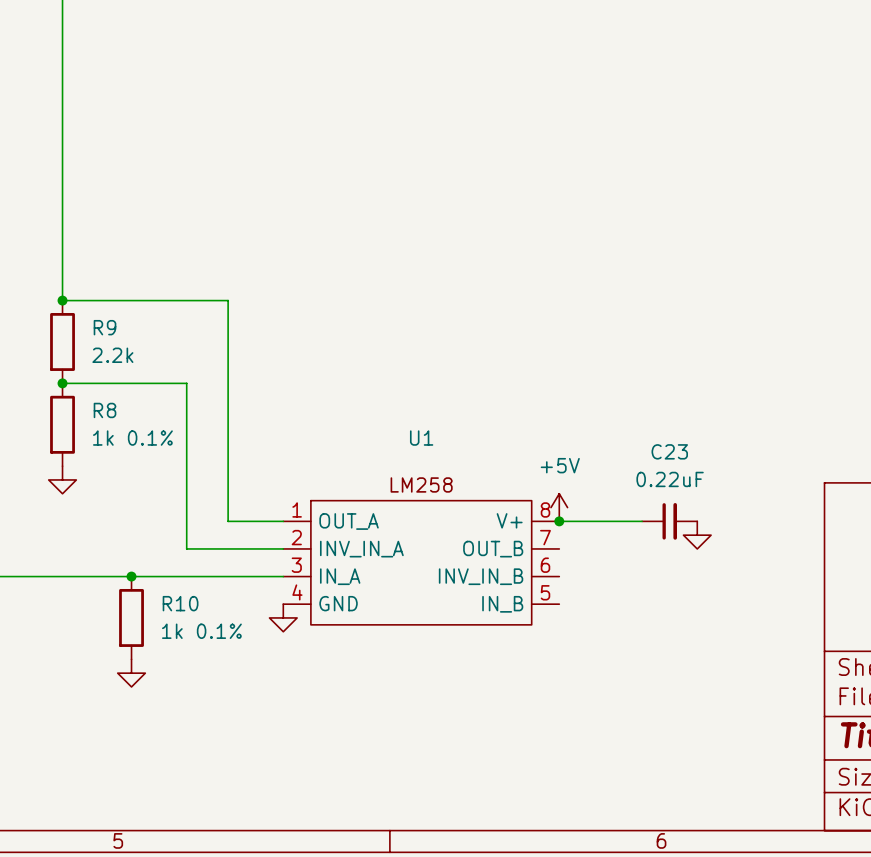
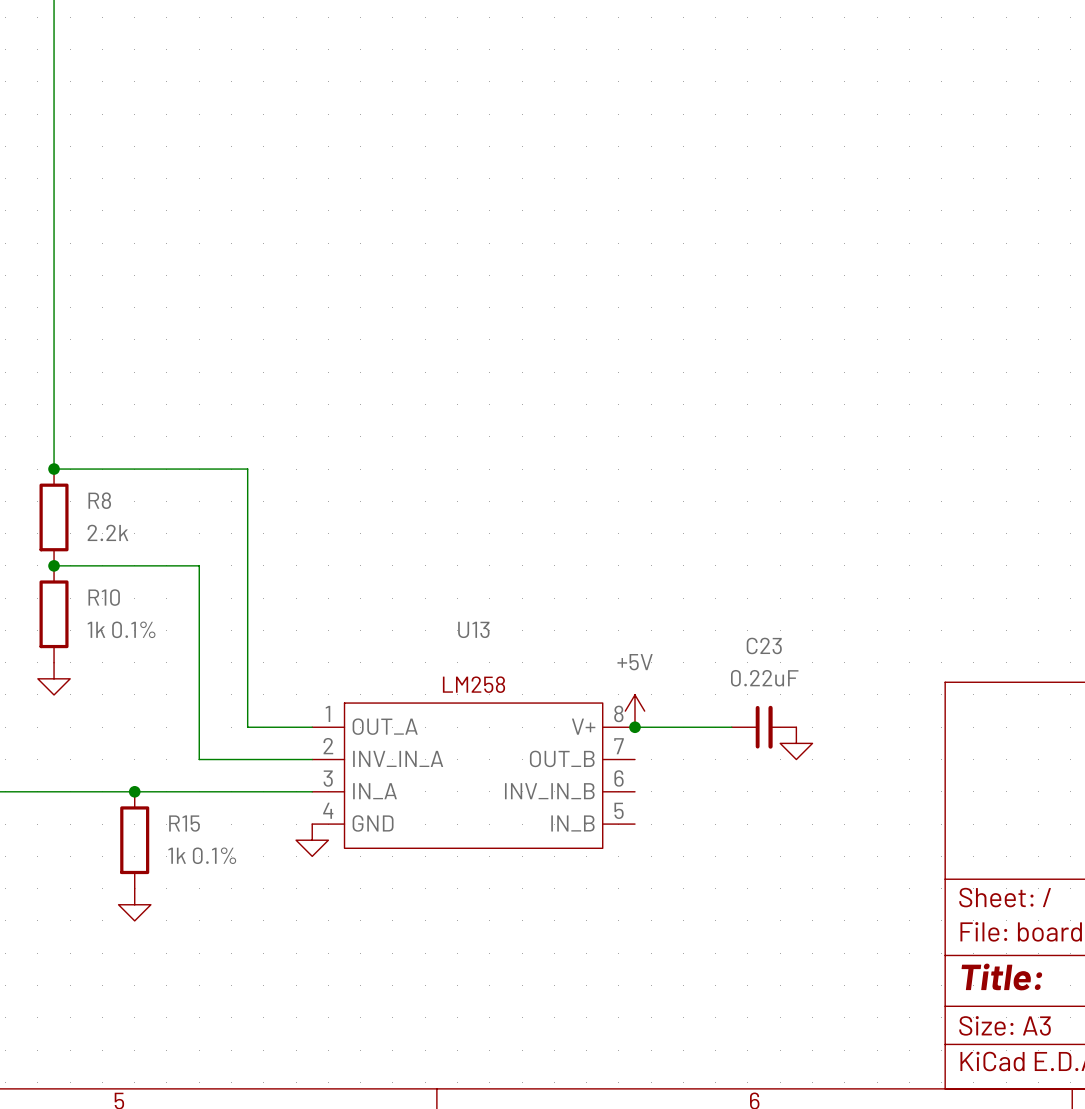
R9 name: R9 (105, 327) -> R8 (99, 500)
R8 name: R8 (105, 410) -> R10 (104, 597)
U1 name: U1 (421, 438) -> U13 (473, 629)
R10 name: R10 (180, 603) -> R15 (184, 823)

